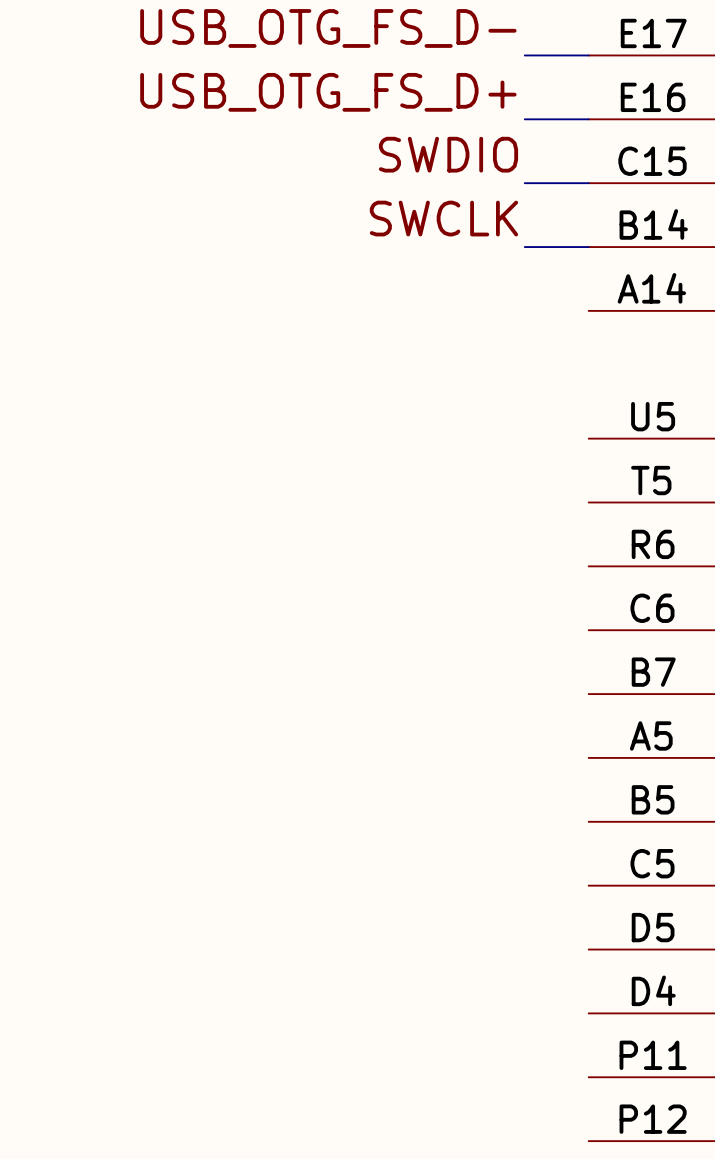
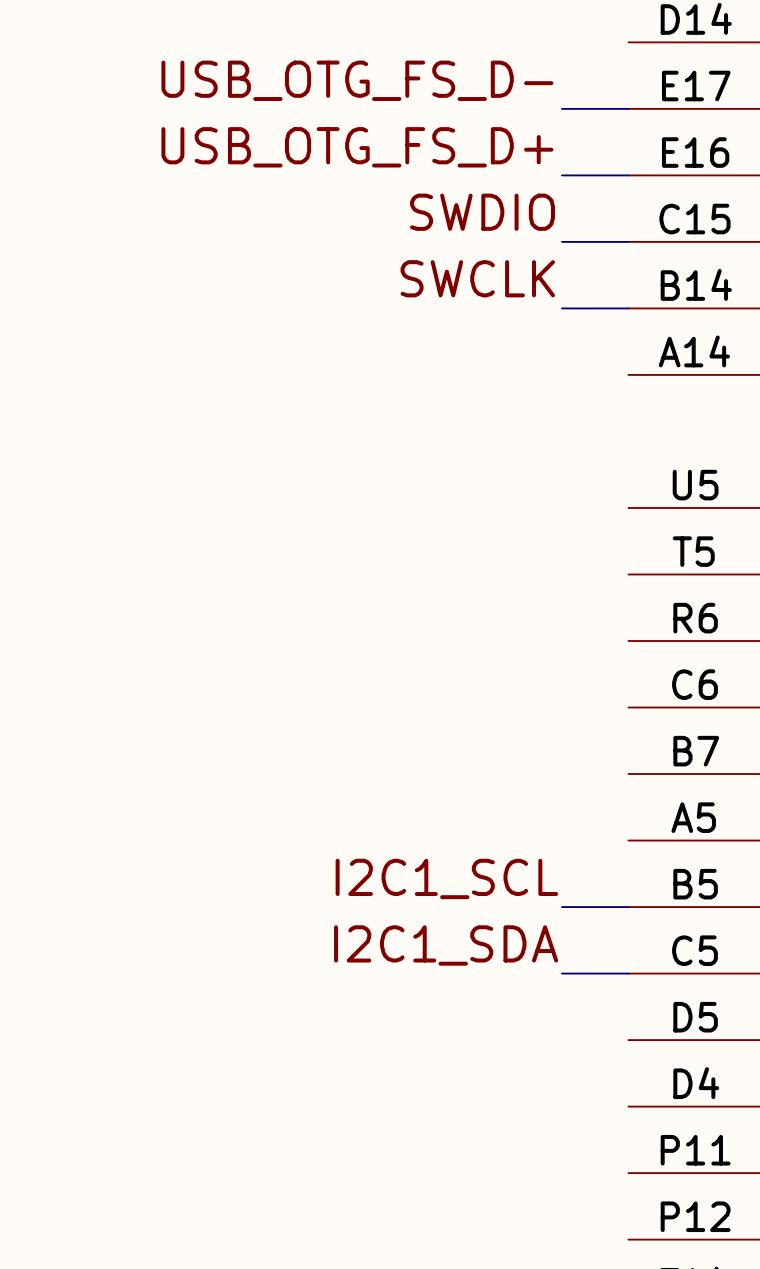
label: none -> I2C1_SCL (446, 878)
wire: none -> (561, 907) (628, 907)
label: none -> I2C1_SDA (446, 945)
wire: none -> (561, 973) (628, 973)

